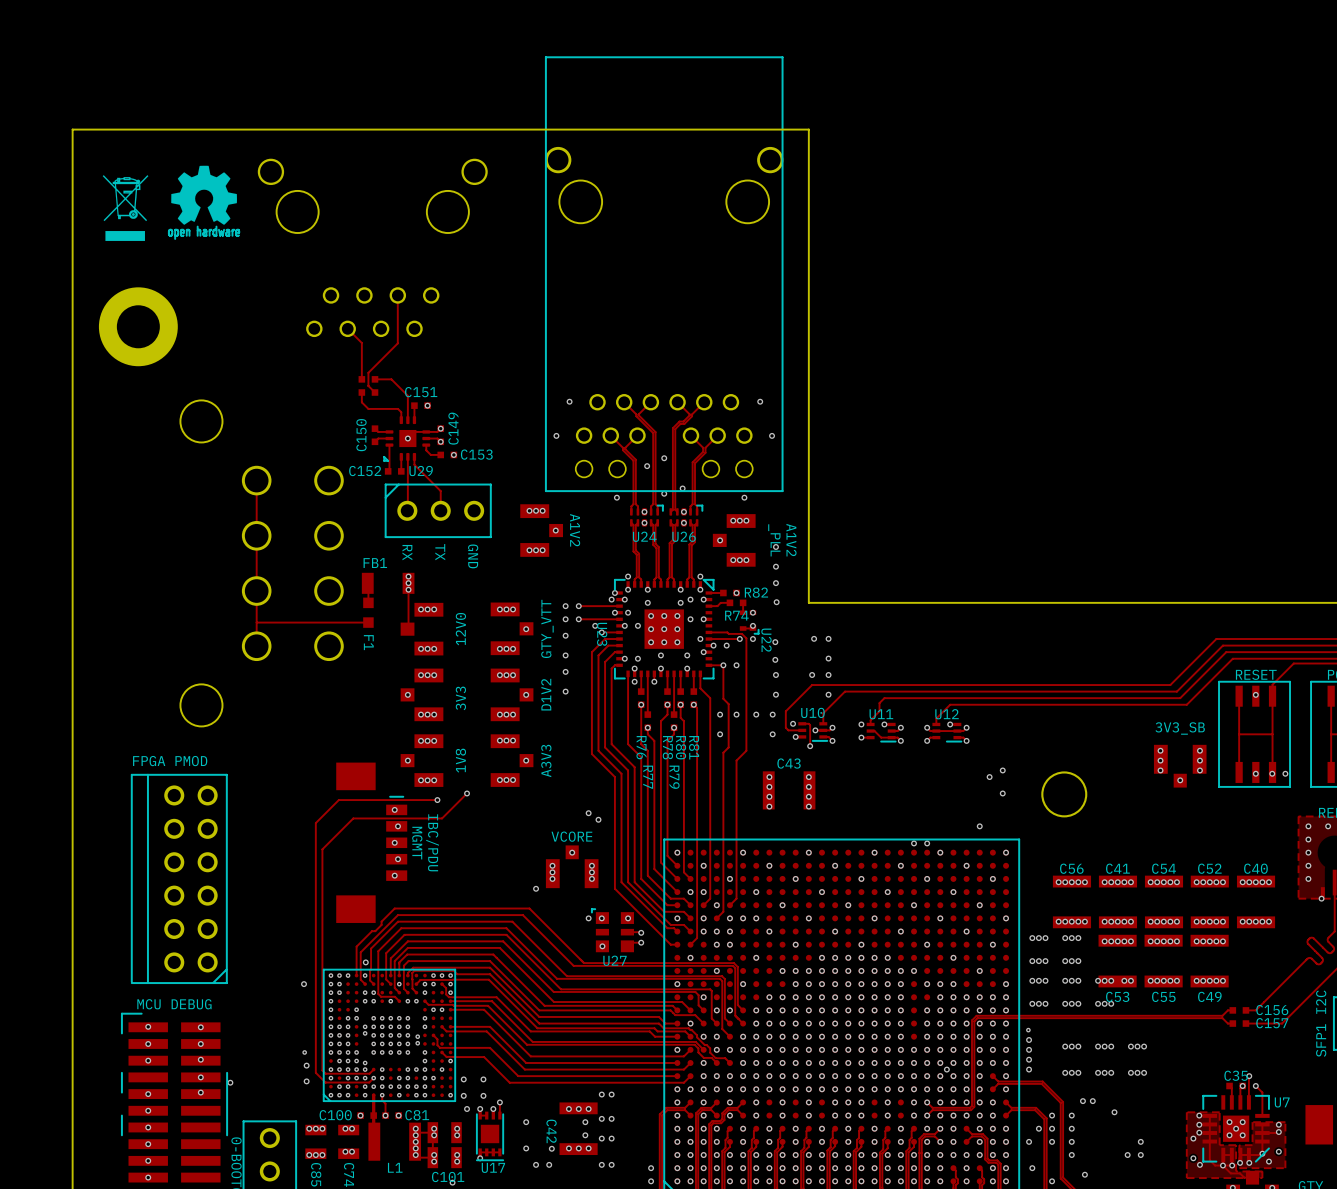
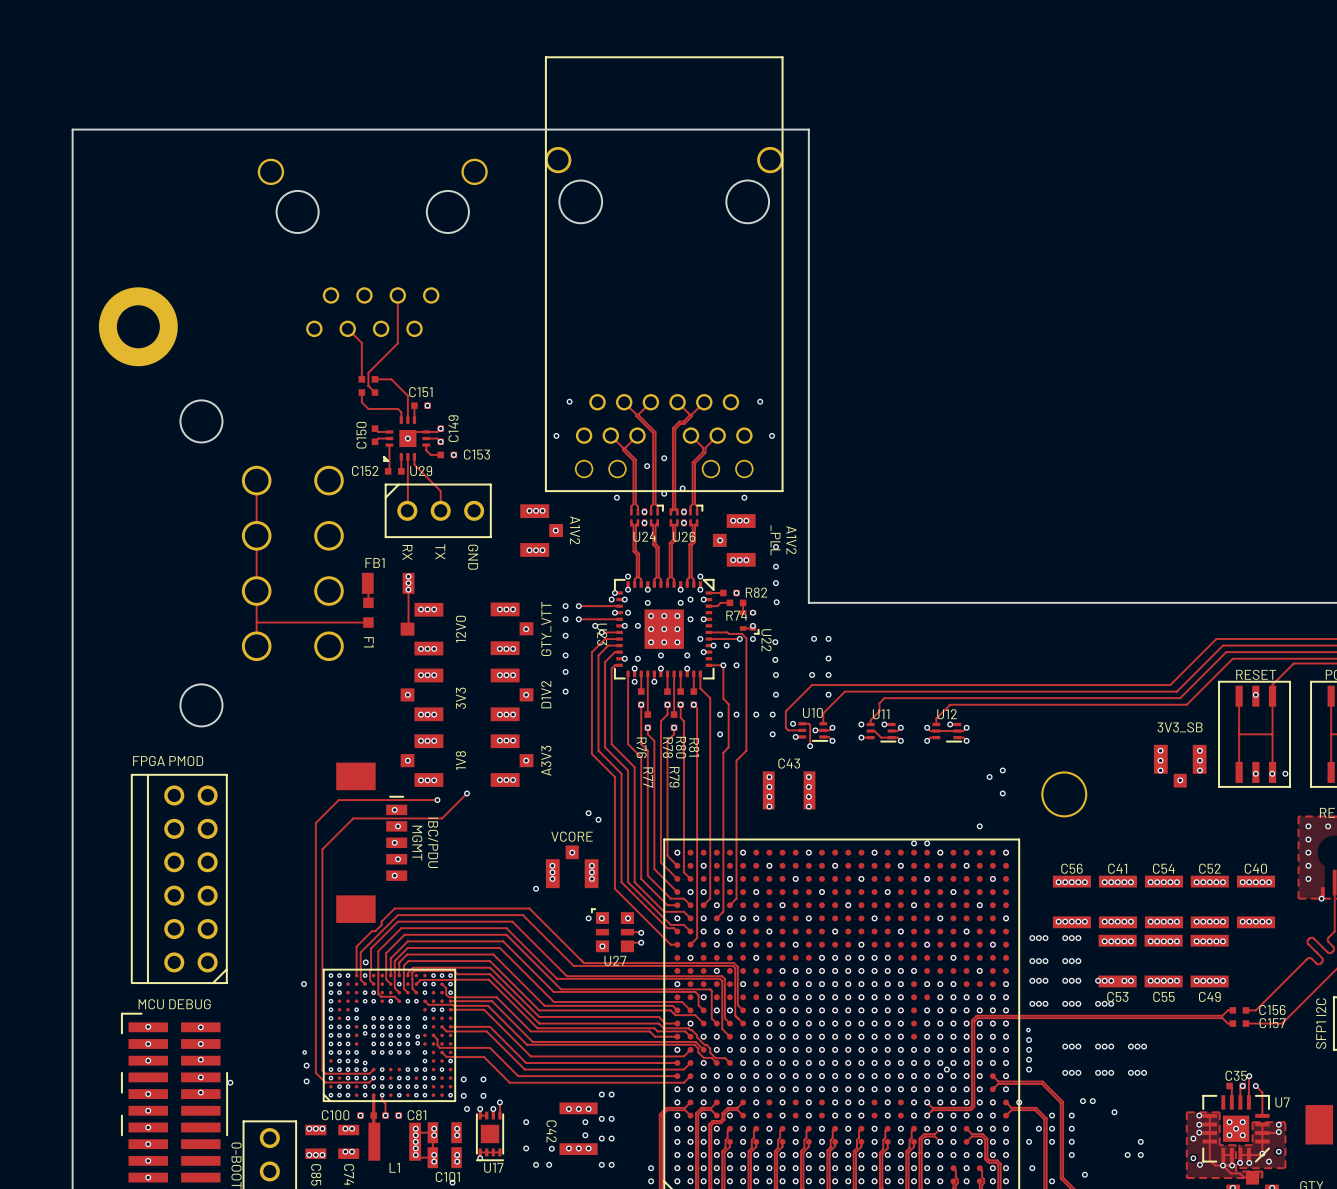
drawing: [168, 165, 240, 240] -> none
drawing: [102, 175, 149, 241] -> none
via: none -> (1019, 1102)

